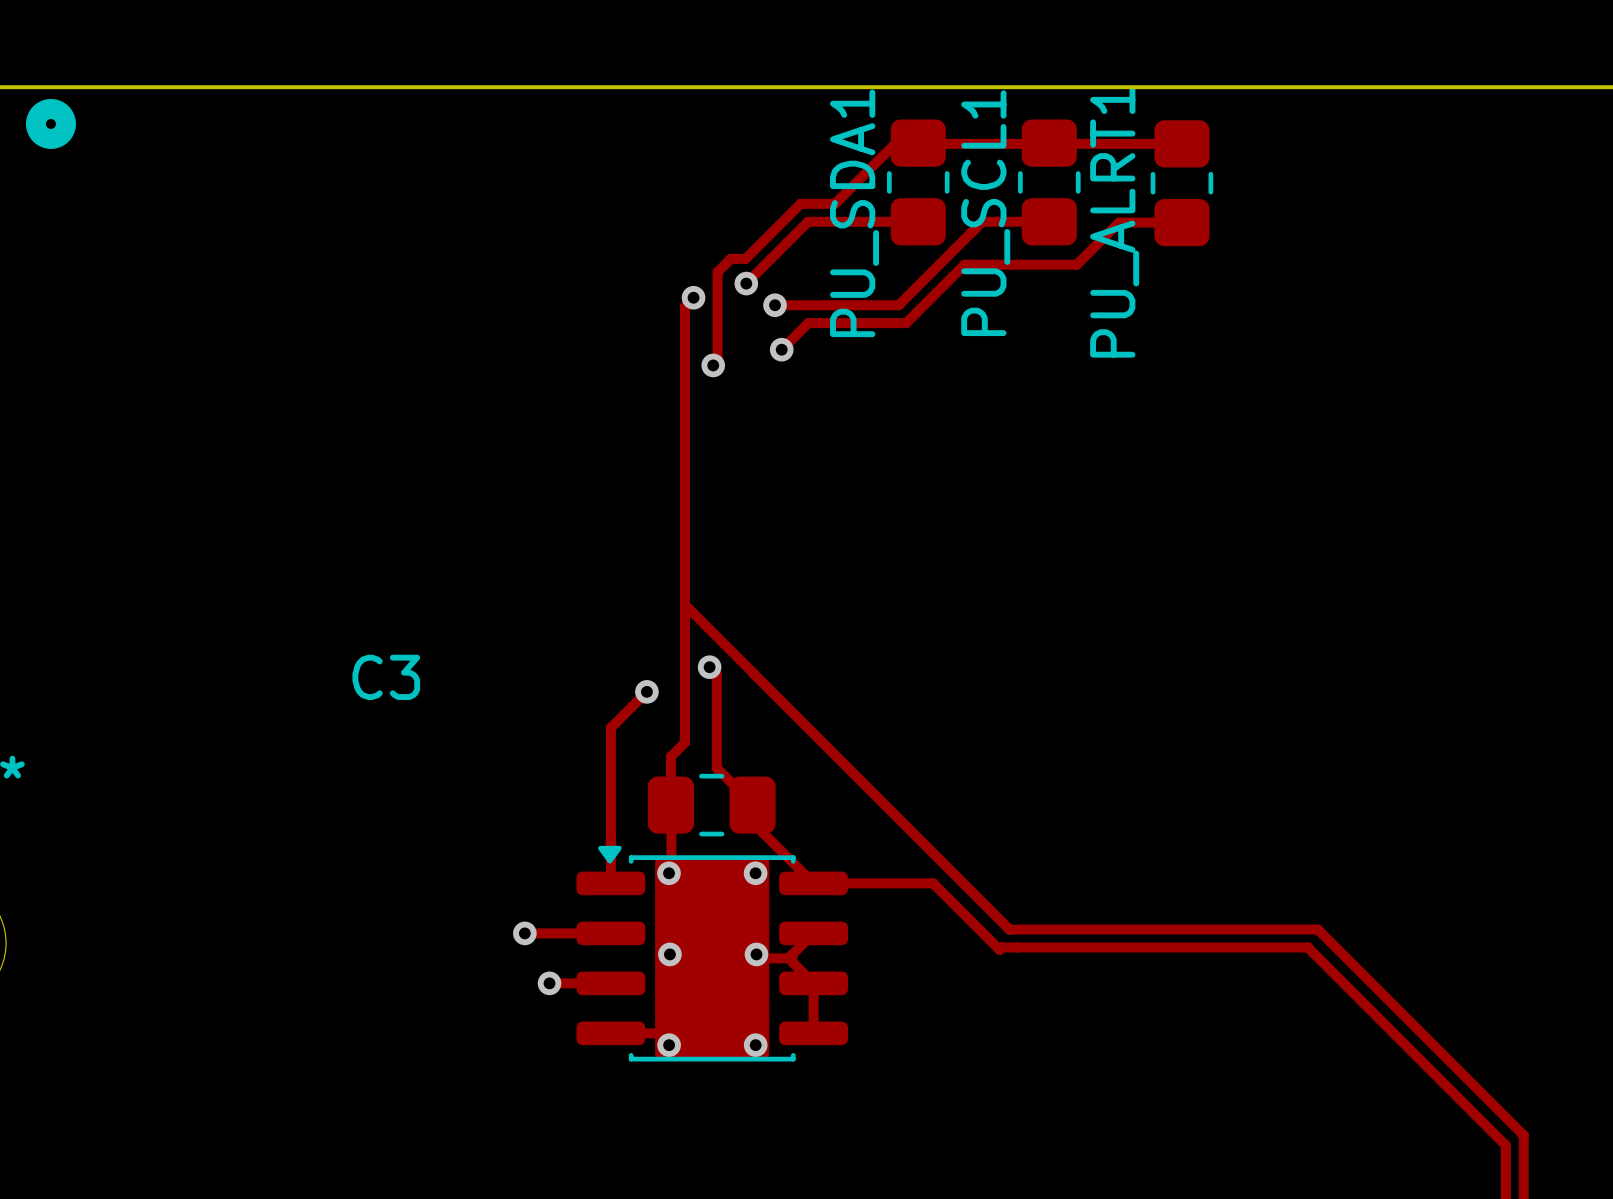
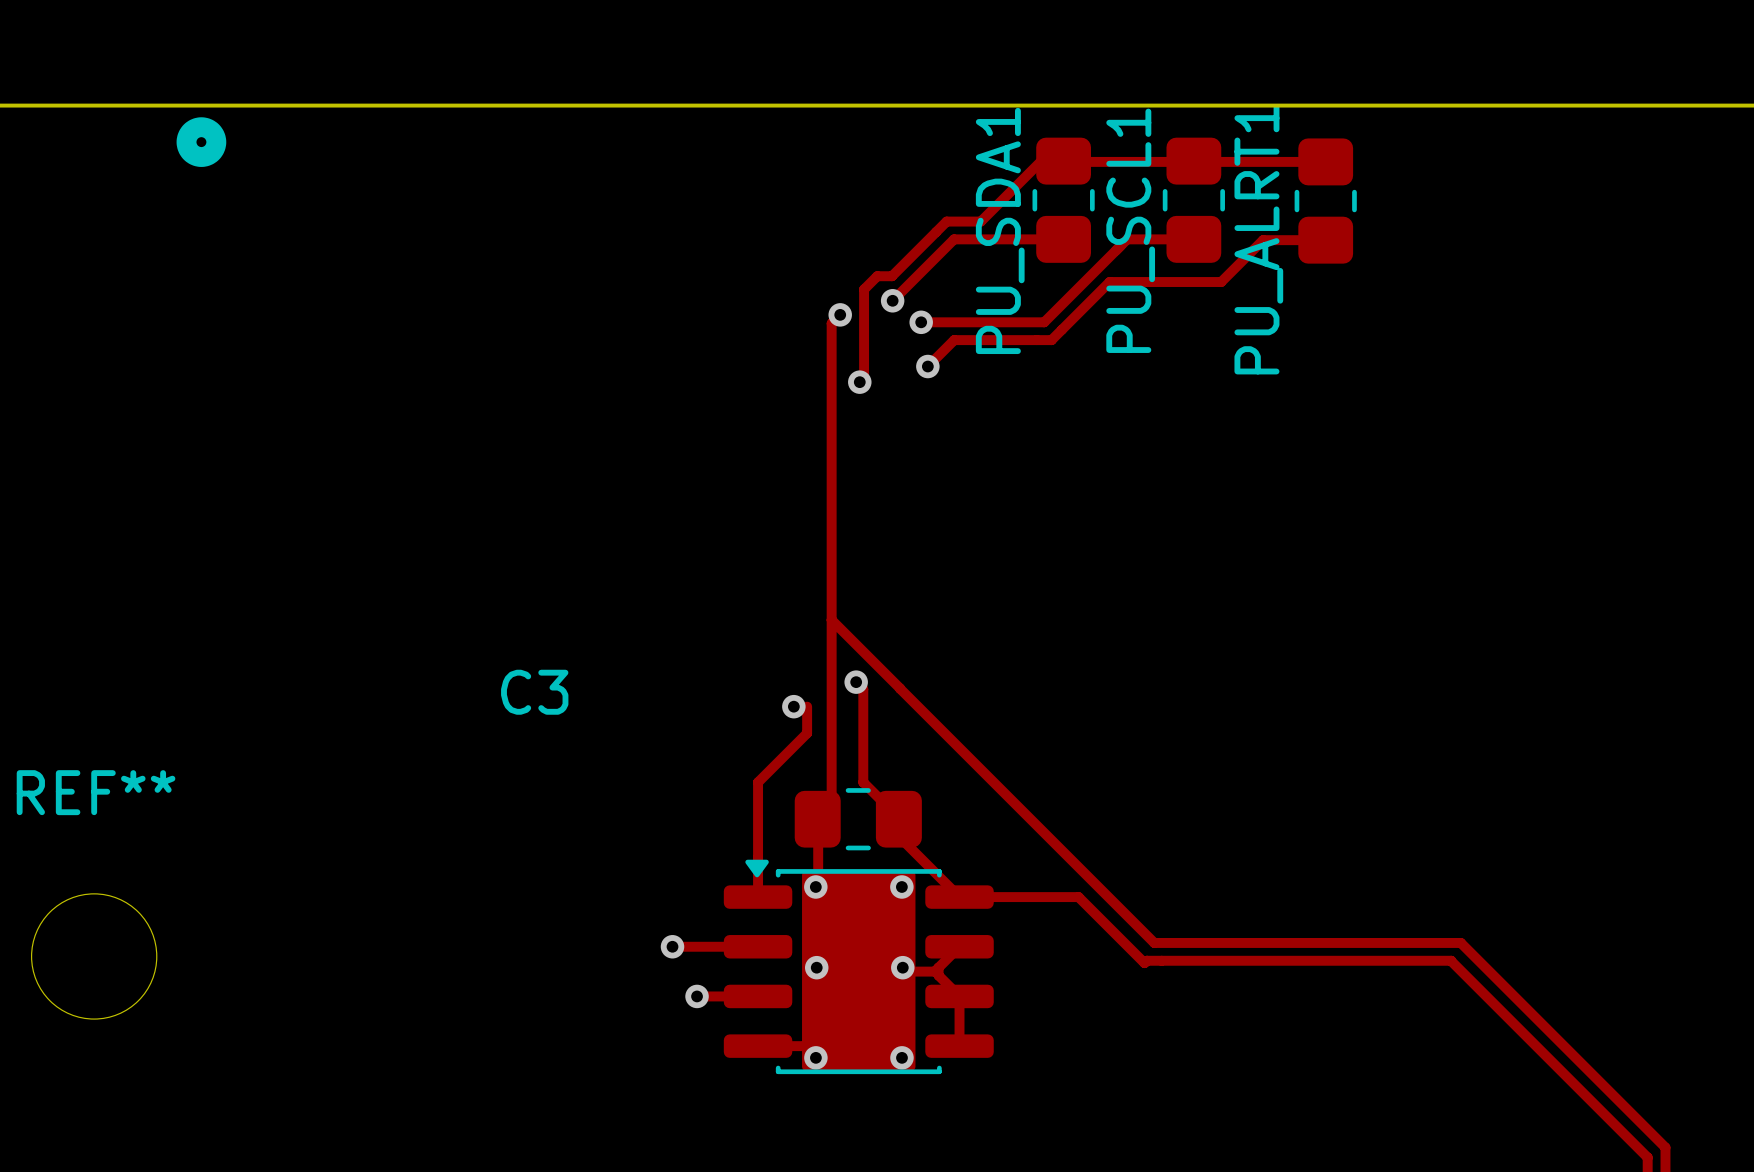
track: (647, 691) (610, 727) (610, 768) -> (807, 706) (807, 733) (758, 782)
track: (684, 742) (670, 756) (670, 790) -> (831, 757) (831, 805) (817, 819)

